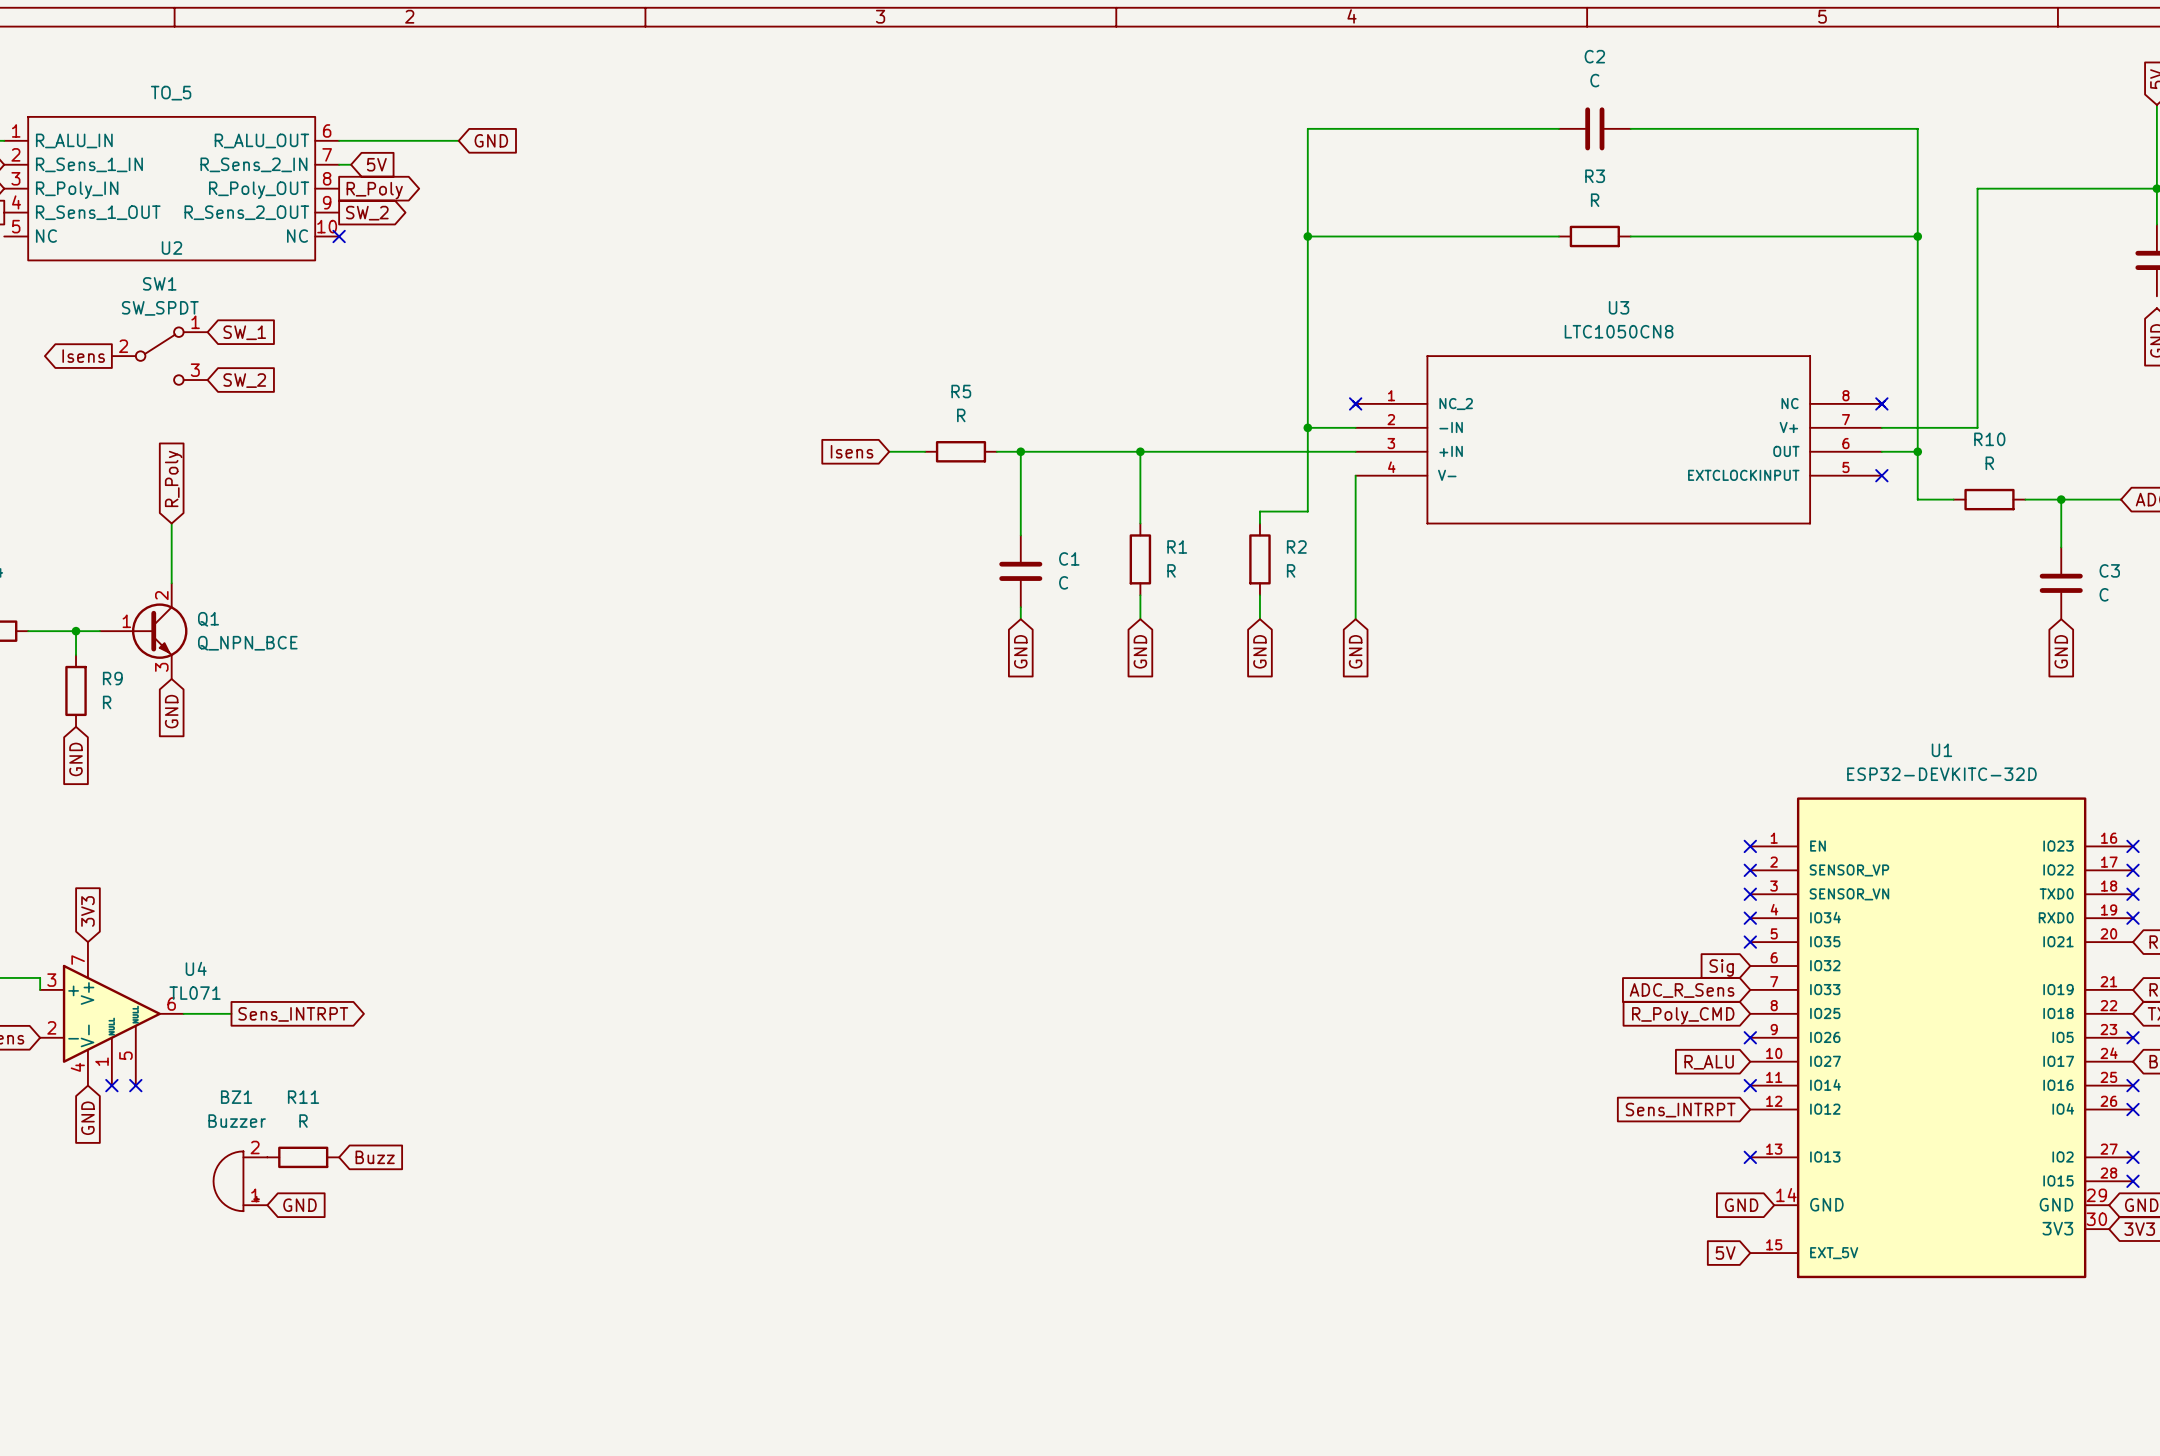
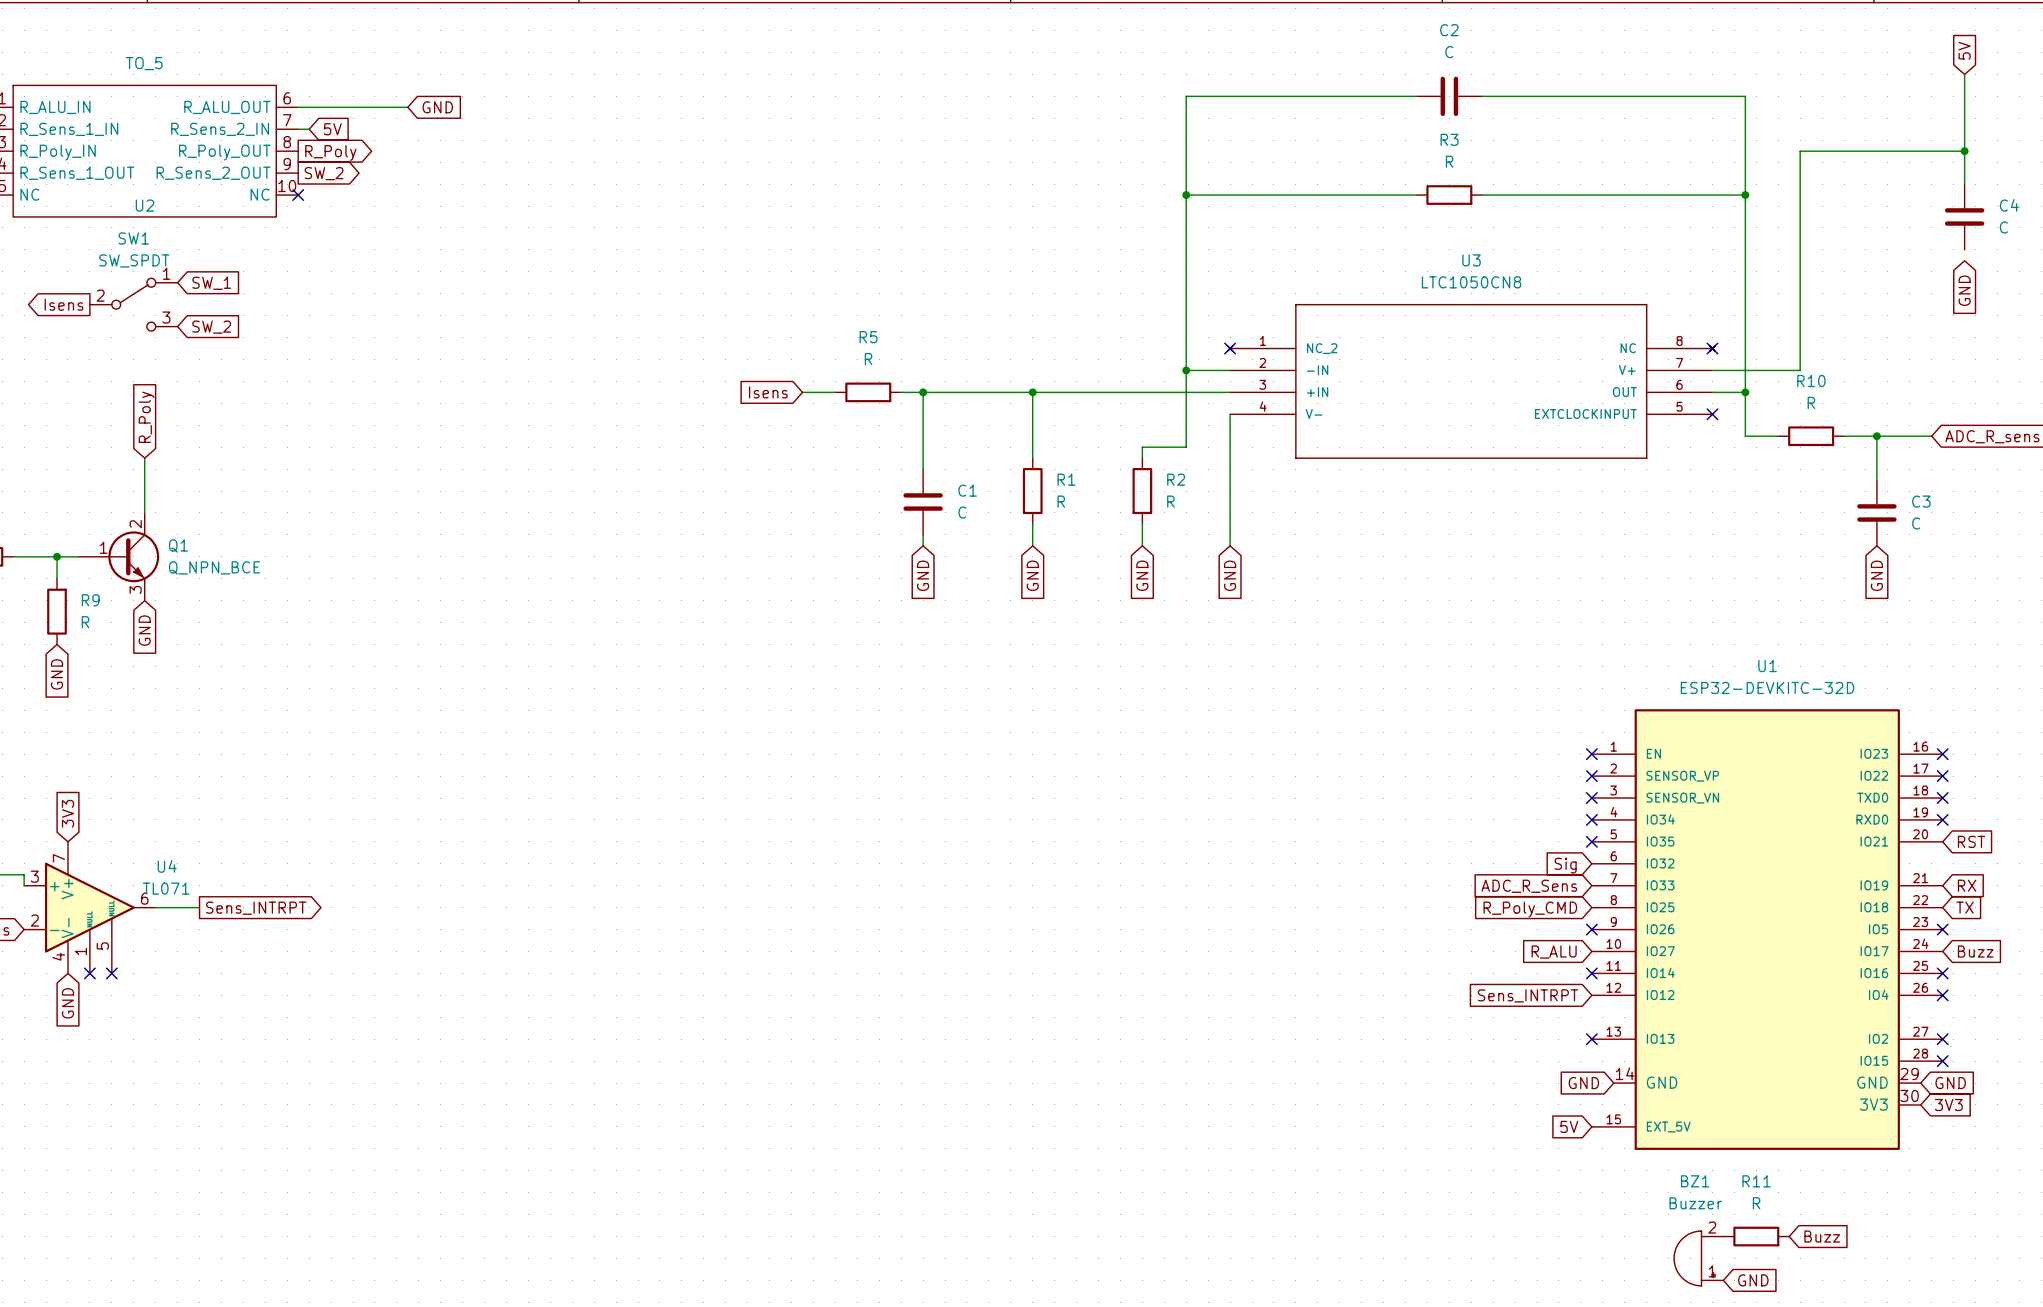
R11 position: (303, 1157) -> (1756, 1236)
global label: Buzz (375, 1157) -> none
BZ1 position: (240, 1181) -> (1698, 1258)
global label: GND (299, 1205) -> none
global label: none -> Buzz (1822, 1236)
global label: none -> GND (1753, 1280)

